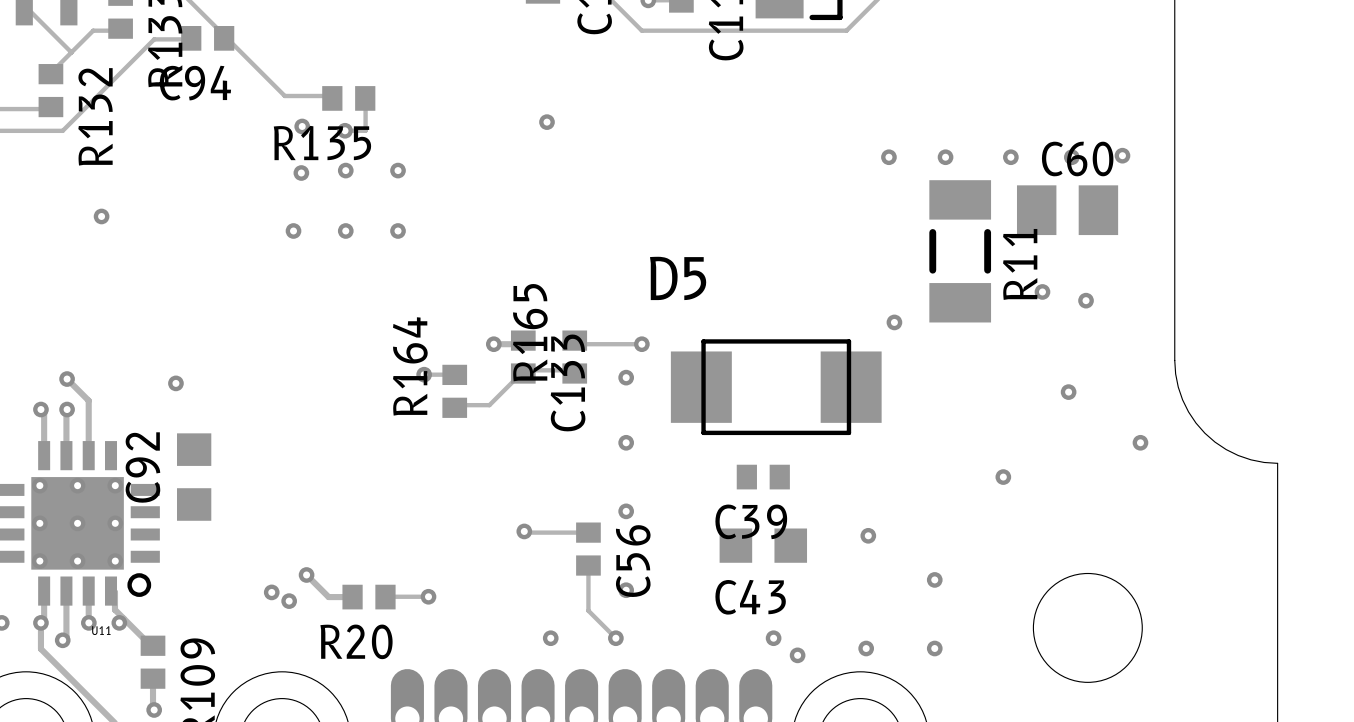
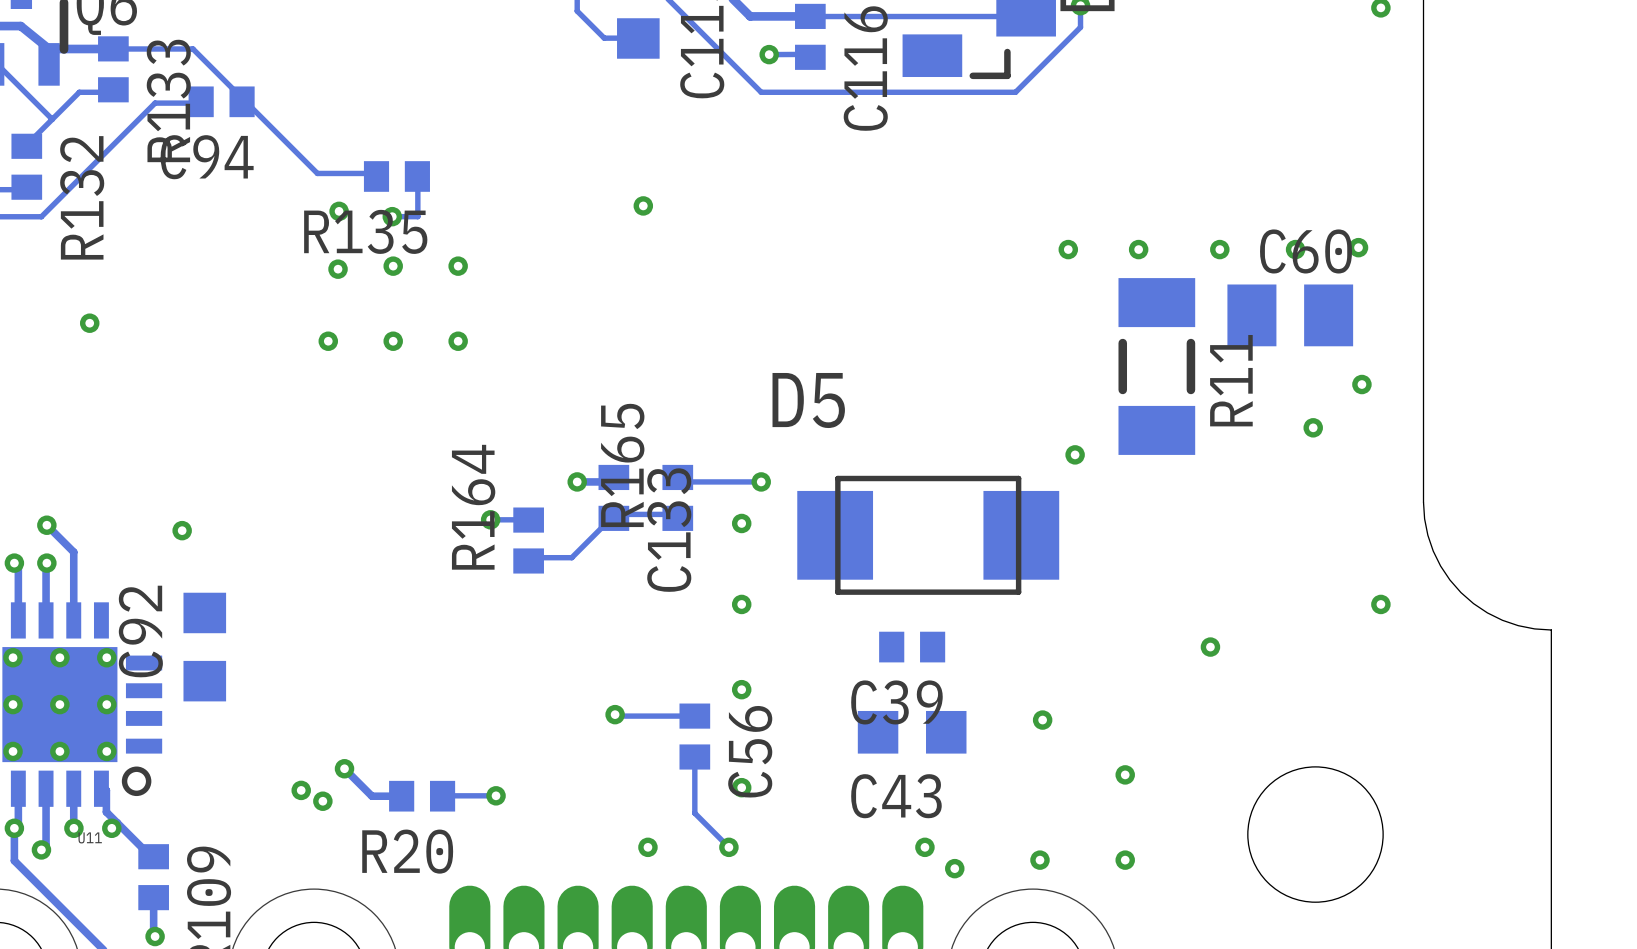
via: none -> (1361, 384)
via: (1042, 291) -> none
via: (1068, 392) -> none

